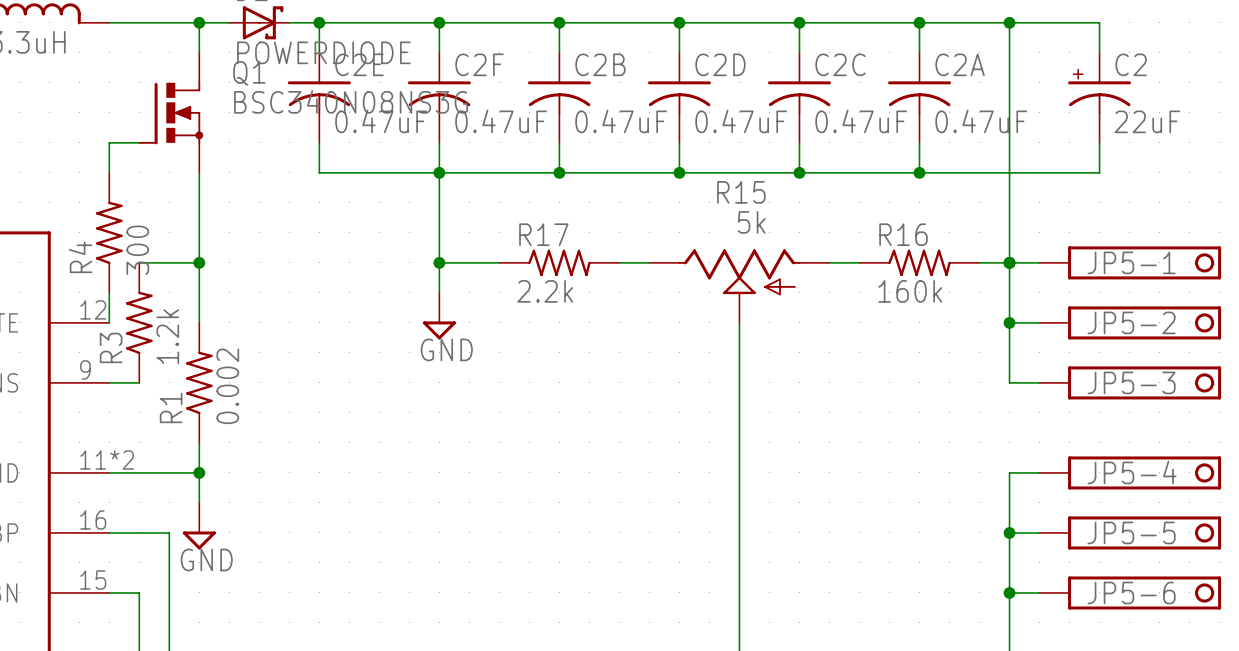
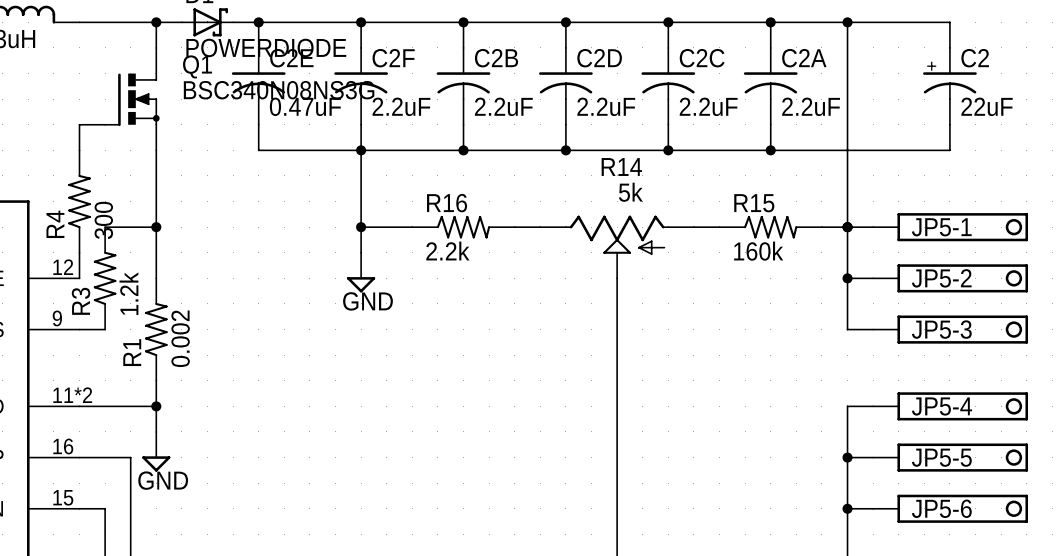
wire: (1099, 22) (1099, 52) -> (924, 22) (949, 22) (949, 47)
C2 position: (1099, 97) -> (949, 86)
C2F value: 0.47uF (501, 121) -> 2.2uF (401, 106)
C2B value: 0.47uF (621, 121) -> 2.2uF (503, 106)
C2D value: 0.47uF (741, 121) -> 2.2uF (606, 106)
C2C value: 0.47uF (861, 121) -> 2.2uF (708, 106)
C2A value: 0.47uF (981, 121) -> 2.2uF (811, 106)
wire: (1099, 142) (1099, 172) -> (949, 124) (949, 150) (924, 150)
R15 name: R15 (741, 192) -> R14 (621, 167)
R17 name: R17 (543, 234) -> R16 (447, 203)
R16 name: R16 (903, 234) -> R15 (754, 203)

